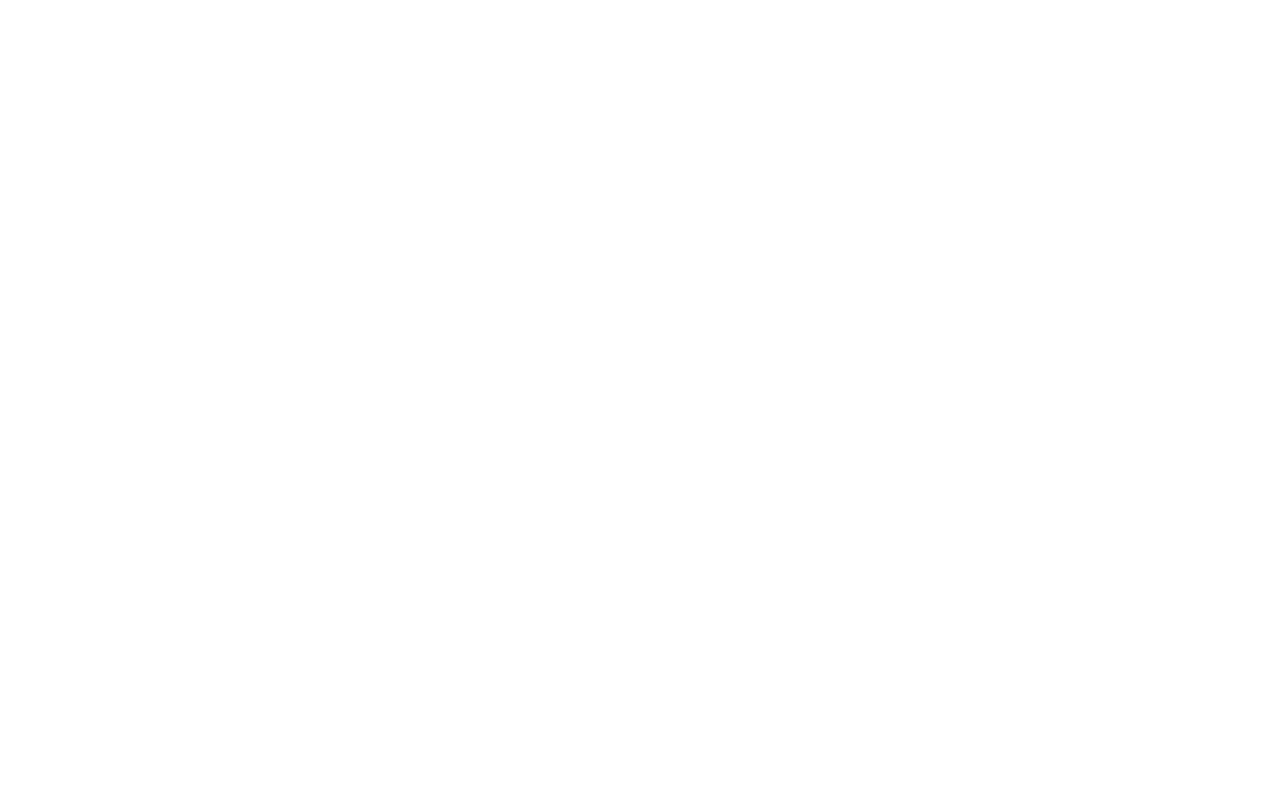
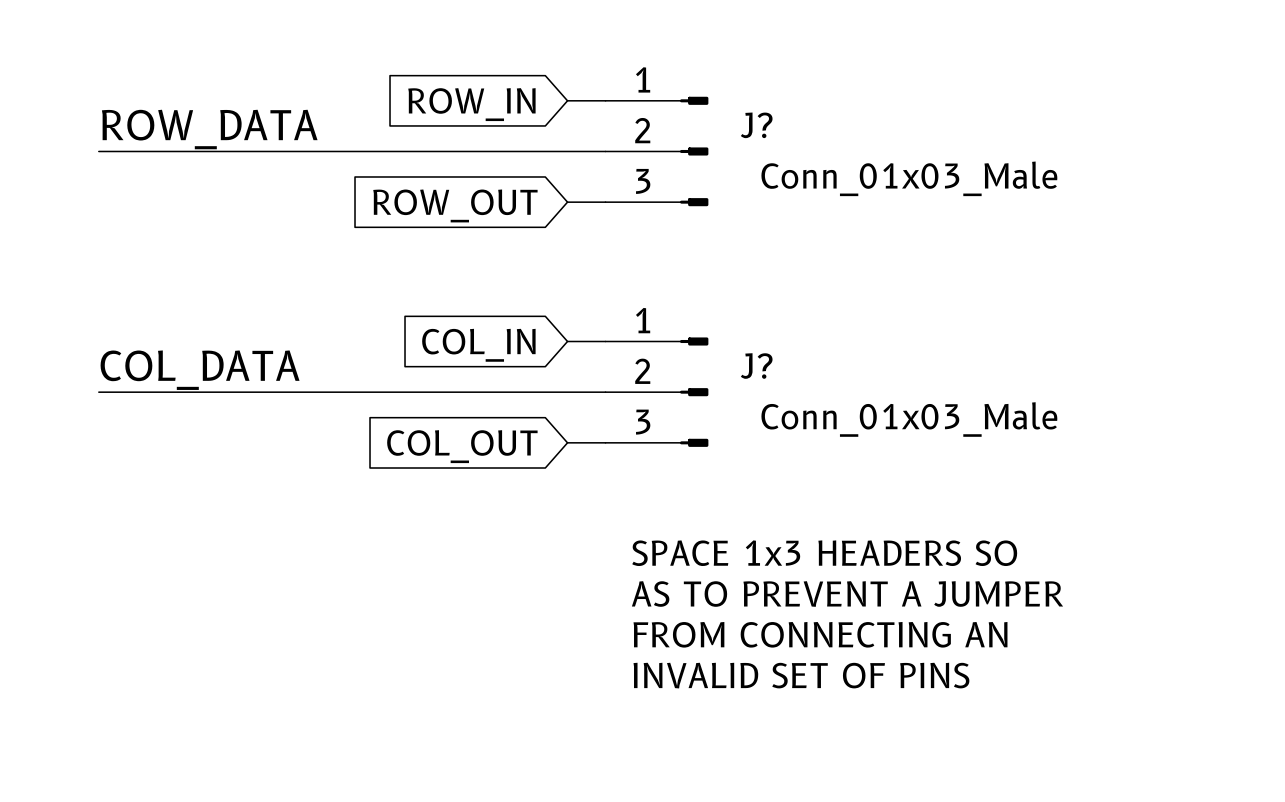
wire: none -> (567, 100) (605, 100)
global label: none -> ROW_IN (471, 104)
label: none -> ROW_DATA (209, 129)
wire: none -> (98, 151) (605, 151)
J?: none -> Conn_01x03_Male (656, 151)
wire: none -> (567, 202) (605, 202)
global label: none -> ROW_OUT (455, 205)
wire: none -> (567, 341) (605, 341)
global label: none -> COL_IN (478, 345)
label: none -> COL_DATA (200, 370)
wire: none -> (98, 392) (605, 392)
J?: none -> Conn_01x03_Male (656, 392)
wire: none -> (567, 442) (605, 442)
global label: none -> COL_OUT (462, 446)
text: none -> SPACE 1x3 HEADERS SO (824, 553)
text: none -> AS TO PREVENT A JUMPER (847, 594)
text: none -> FROM CONNECTING AN (820, 634)
text: none -> INVALID SET OF PINS (801, 675)

